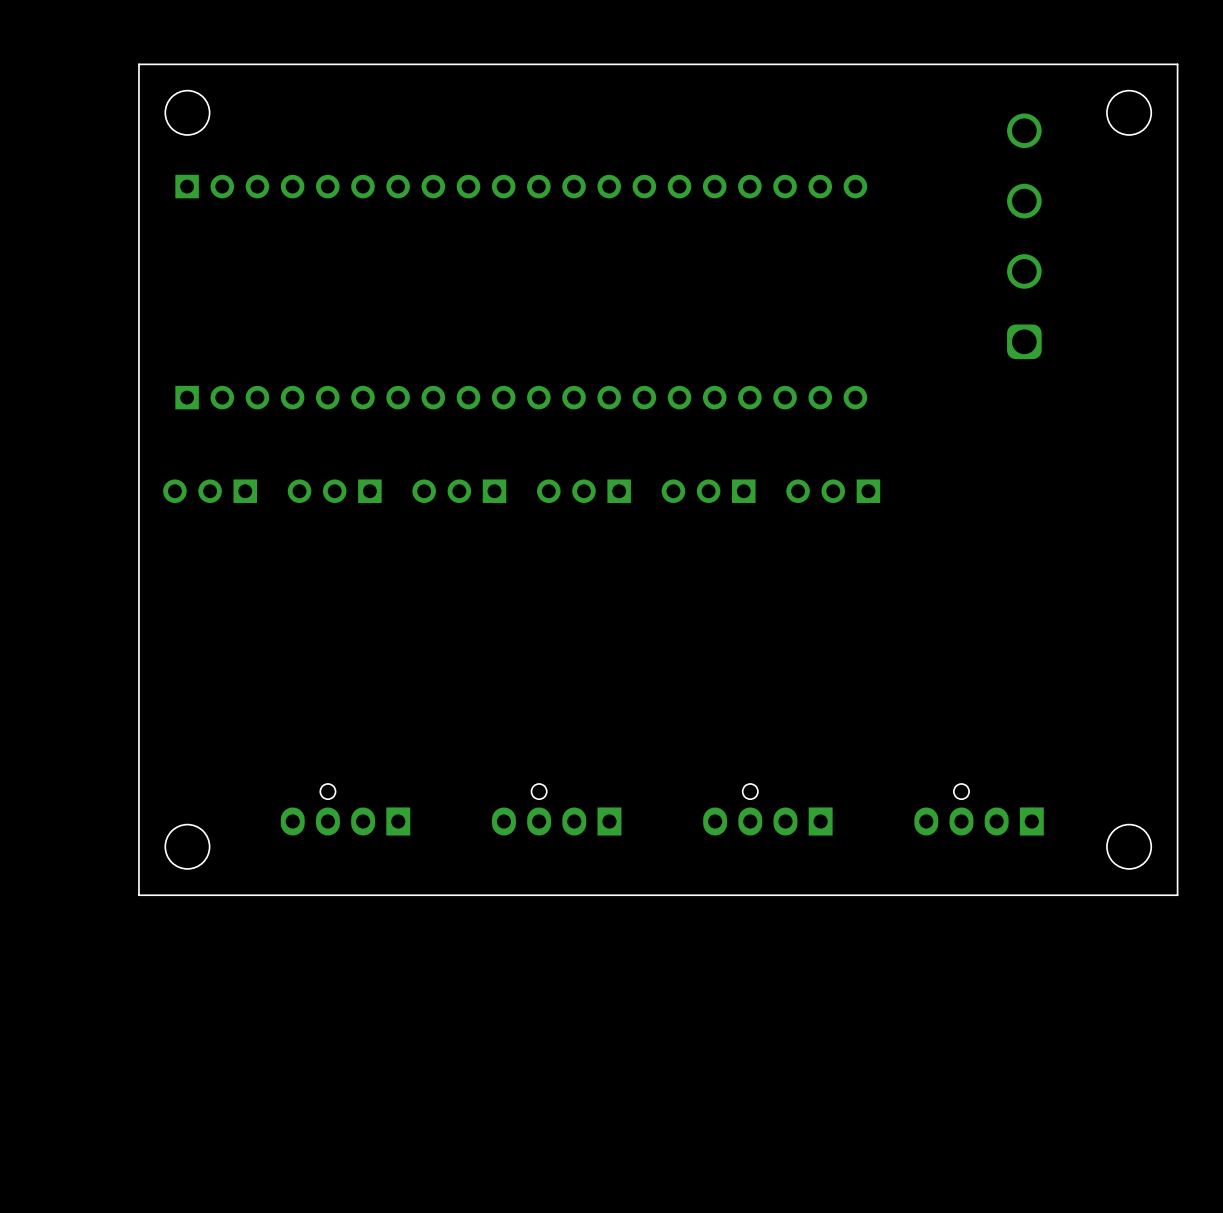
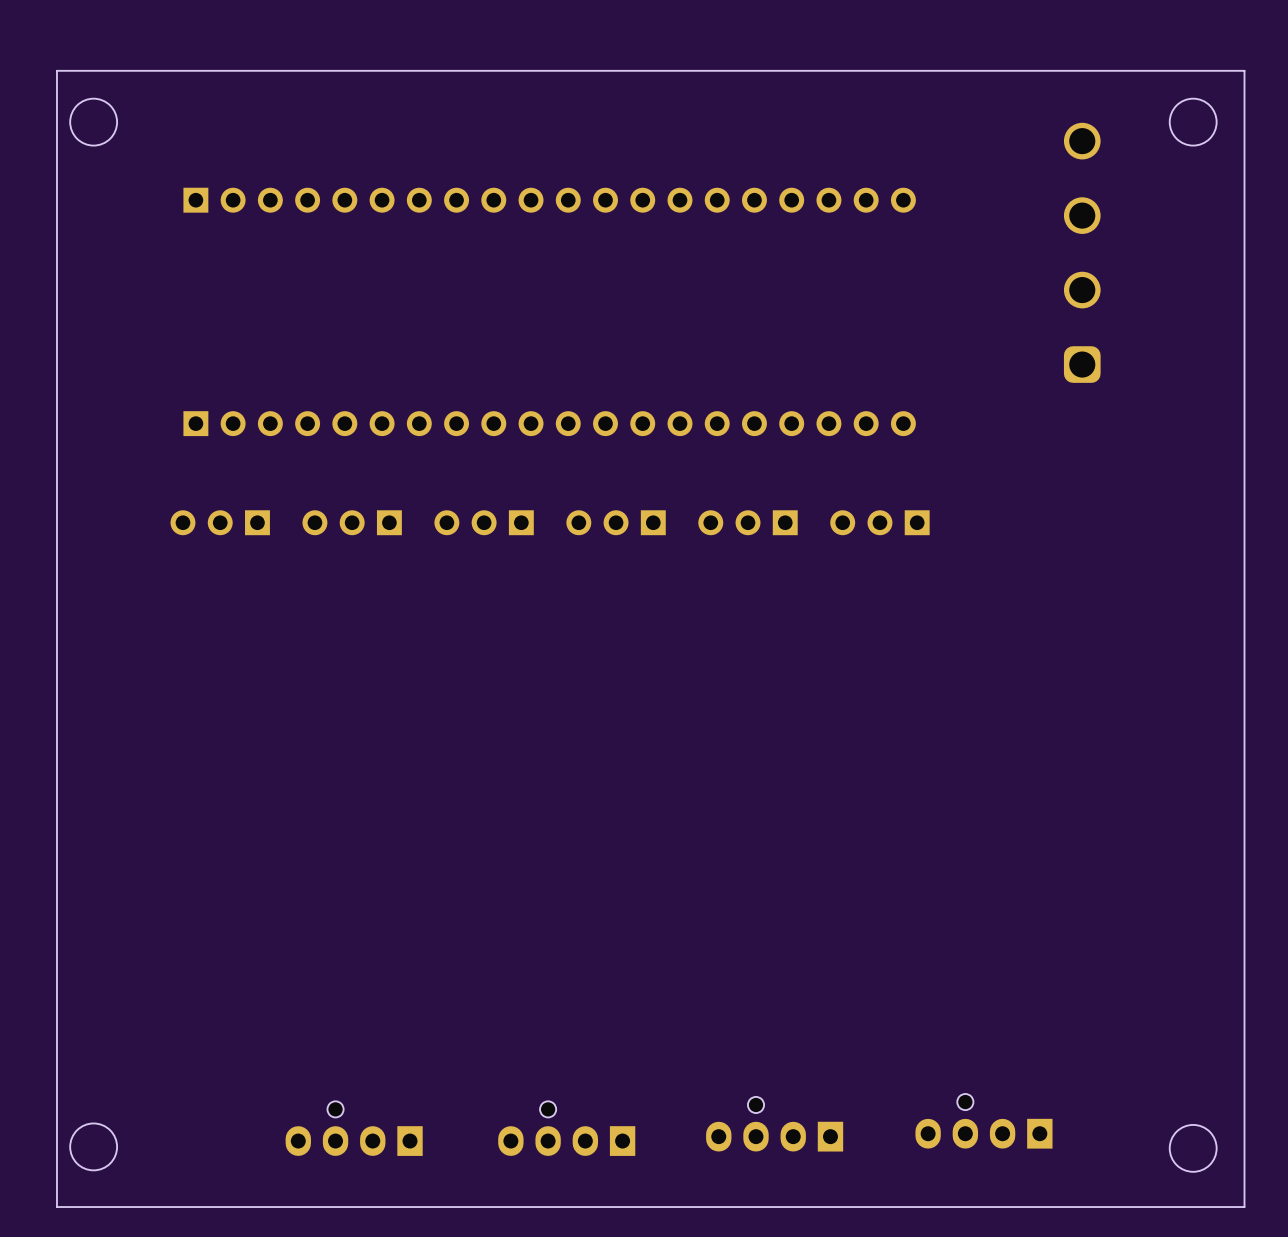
board edge: (138, 64) (138, 895) (1177, 895) -> (144, 70) (56, 70) (56, 1207) (1244, 1207) (1244, 950)
round board edge position: (187, 112) -> (93, 122)
part: (345, 809) -> none
part: (556, 809) -> none
part: (767, 809) -> none
part: (979, 809) -> none
round board edge position: (187, 846) -> (93, 1146)
round board edge position: (1129, 846) -> (1193, 1148)
part: none -> (983, 1121)
part: none -> (774, 1124)
part: none -> (354, 1128)
part: none -> (566, 1128)

